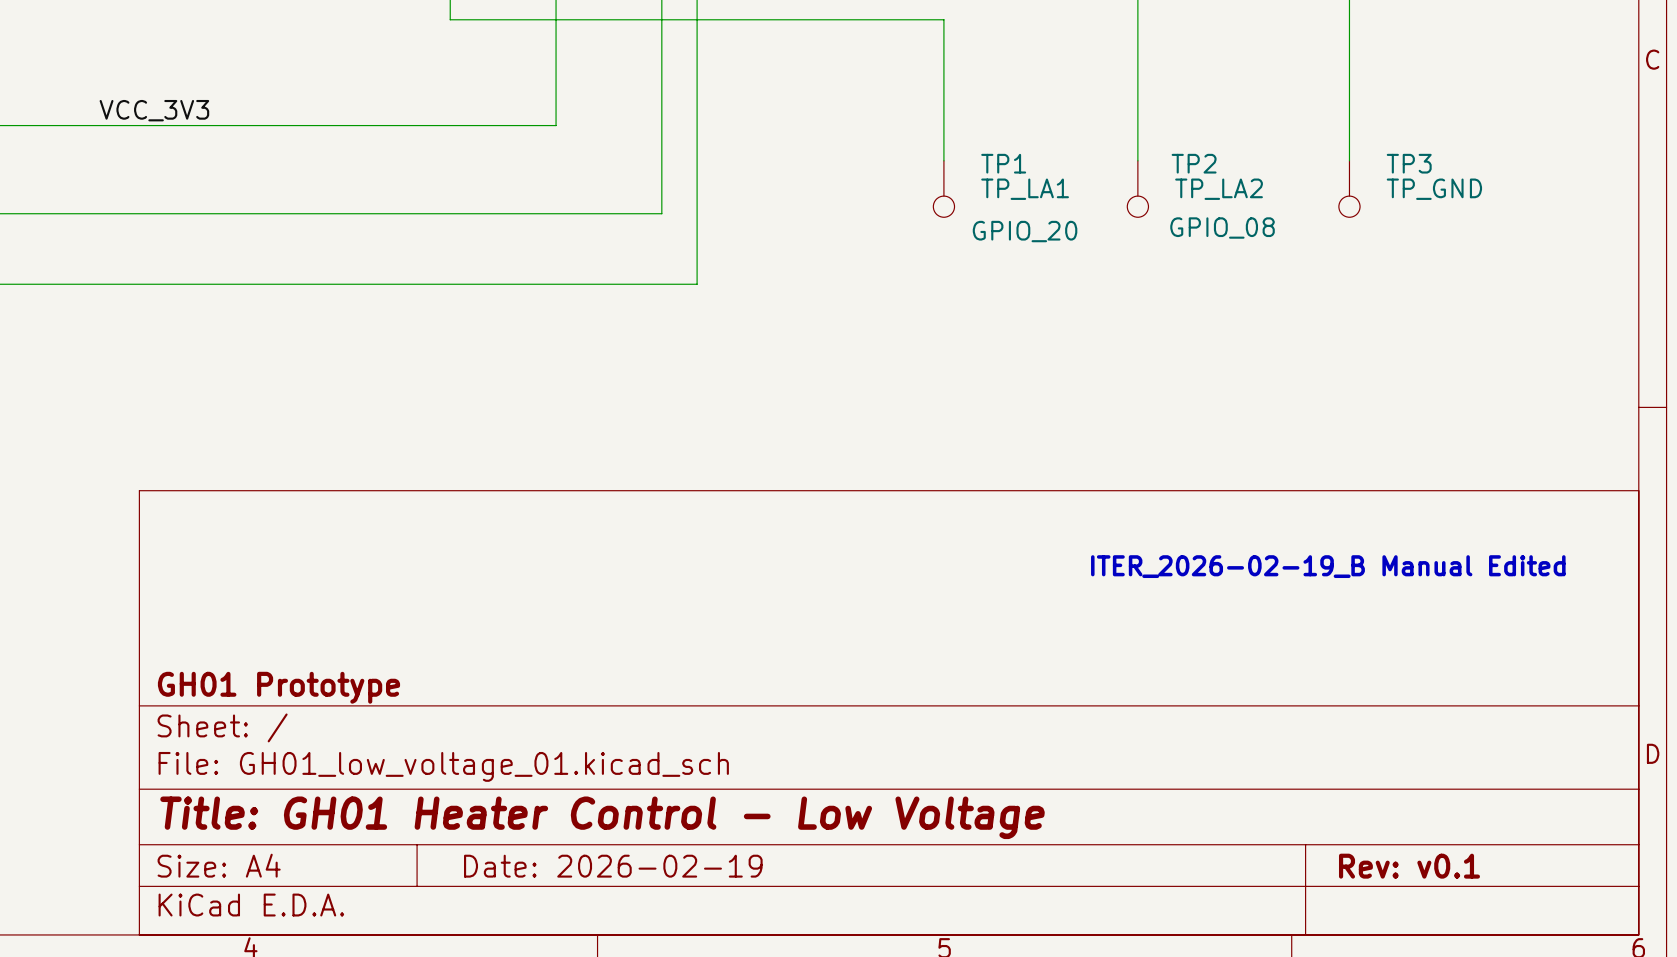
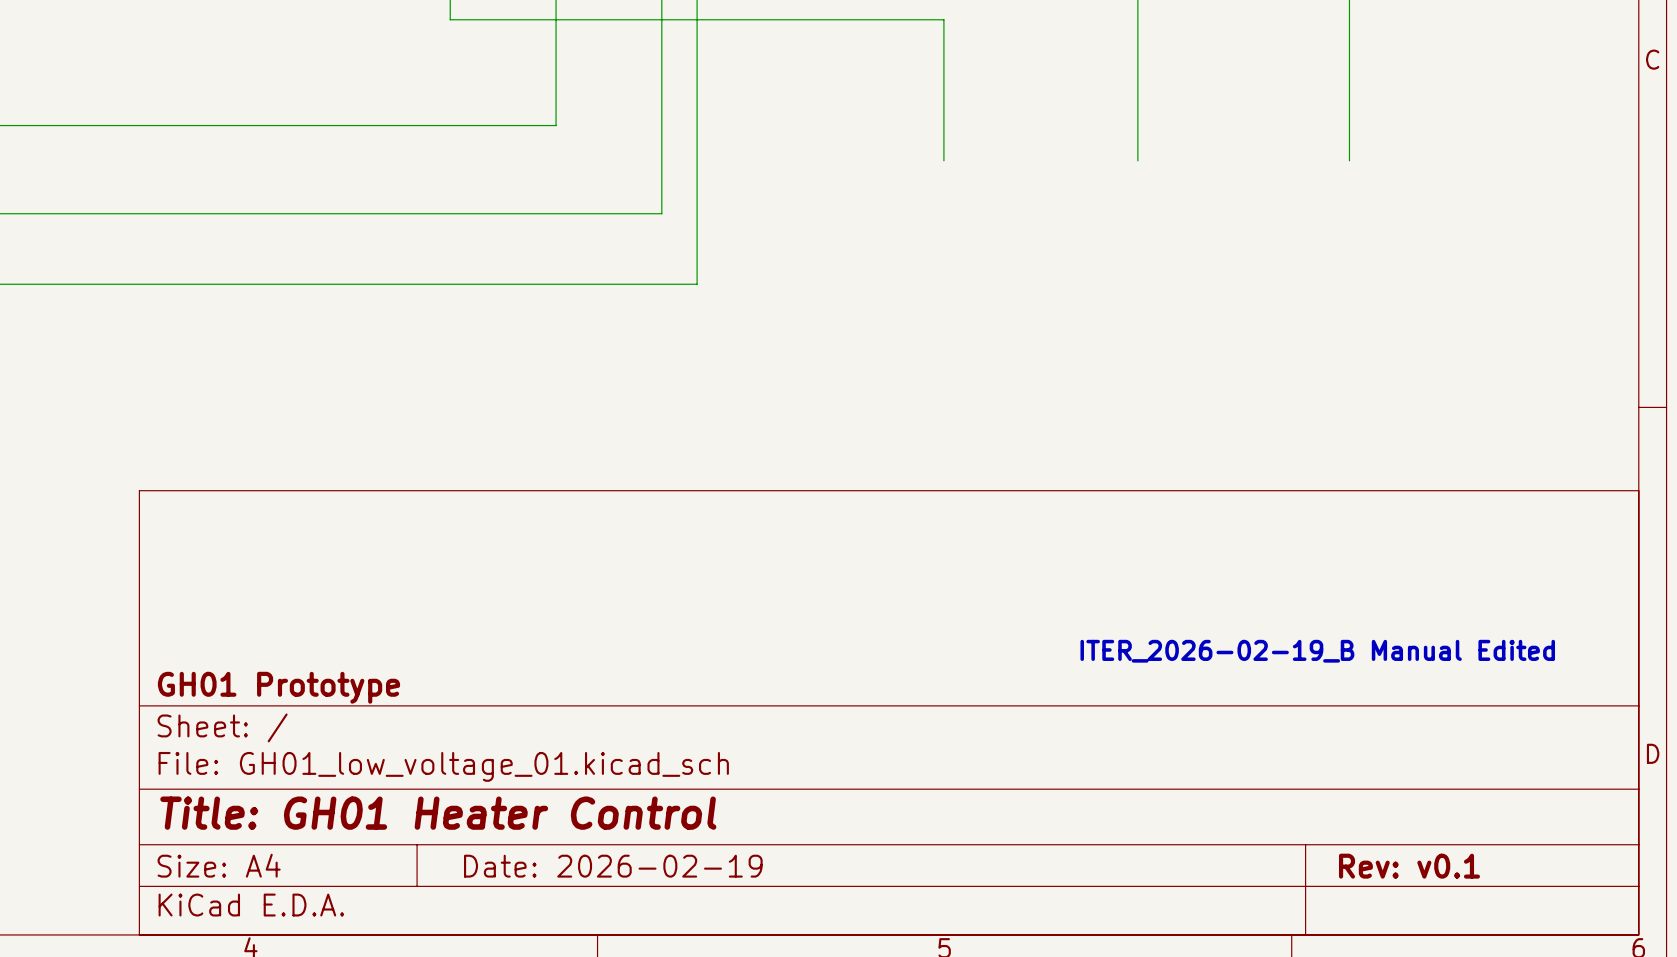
label: VCC_3V3 (154, 110) -> none
TP1: TP_LA1 (943, 189) -> none
TP2: TP_LA2 (1137, 189) -> none
TP3: TP_GND (1349, 189) -> none
text position: ITER_2026-02-19_B Manual Edited (1328, 566) -> ITER_2026-02-19_B Manual Edited (1317, 651)
title block: Title: GH01 Heater Control - Low Voltage (602, 817) -> Title: GH01 Heater Control (438, 813)

